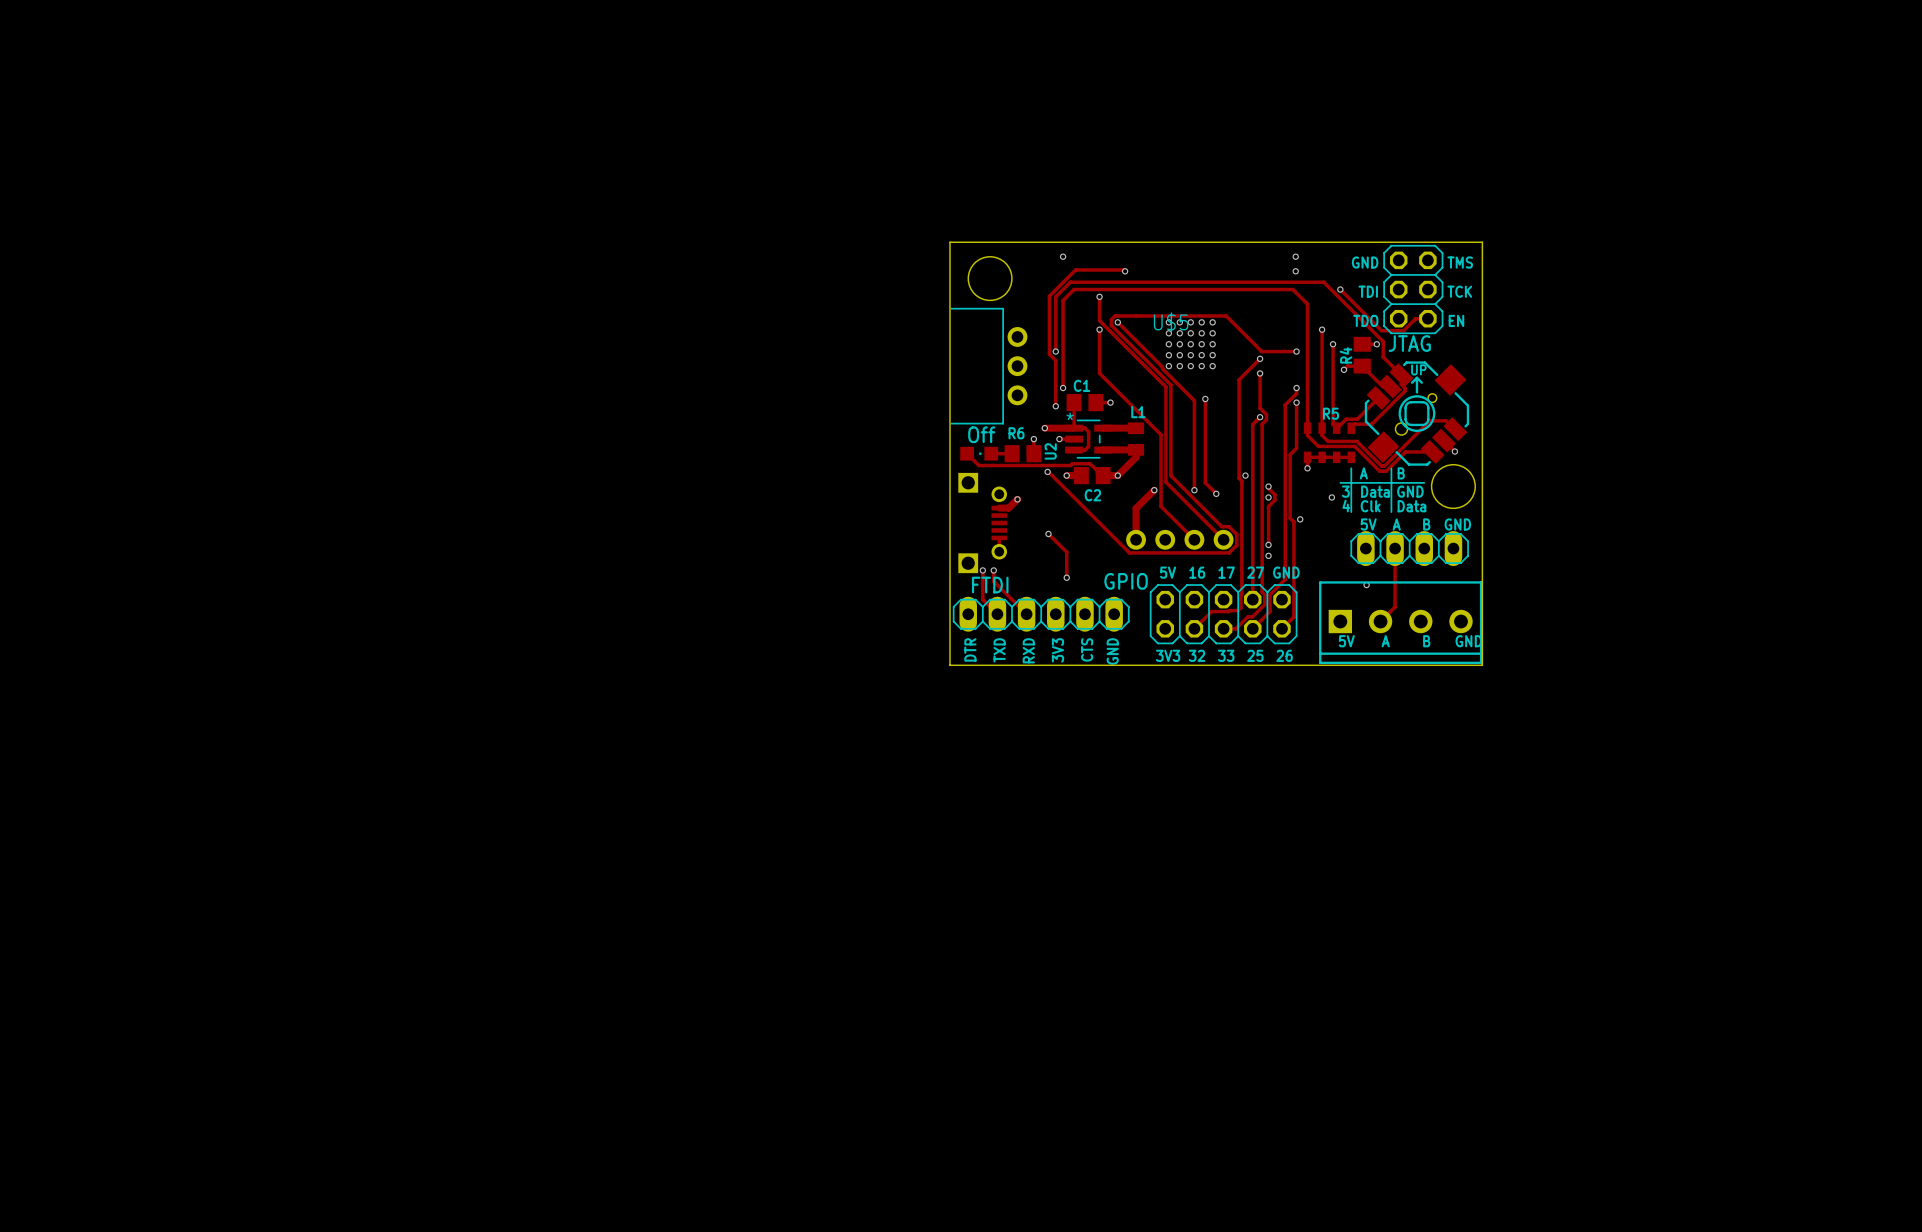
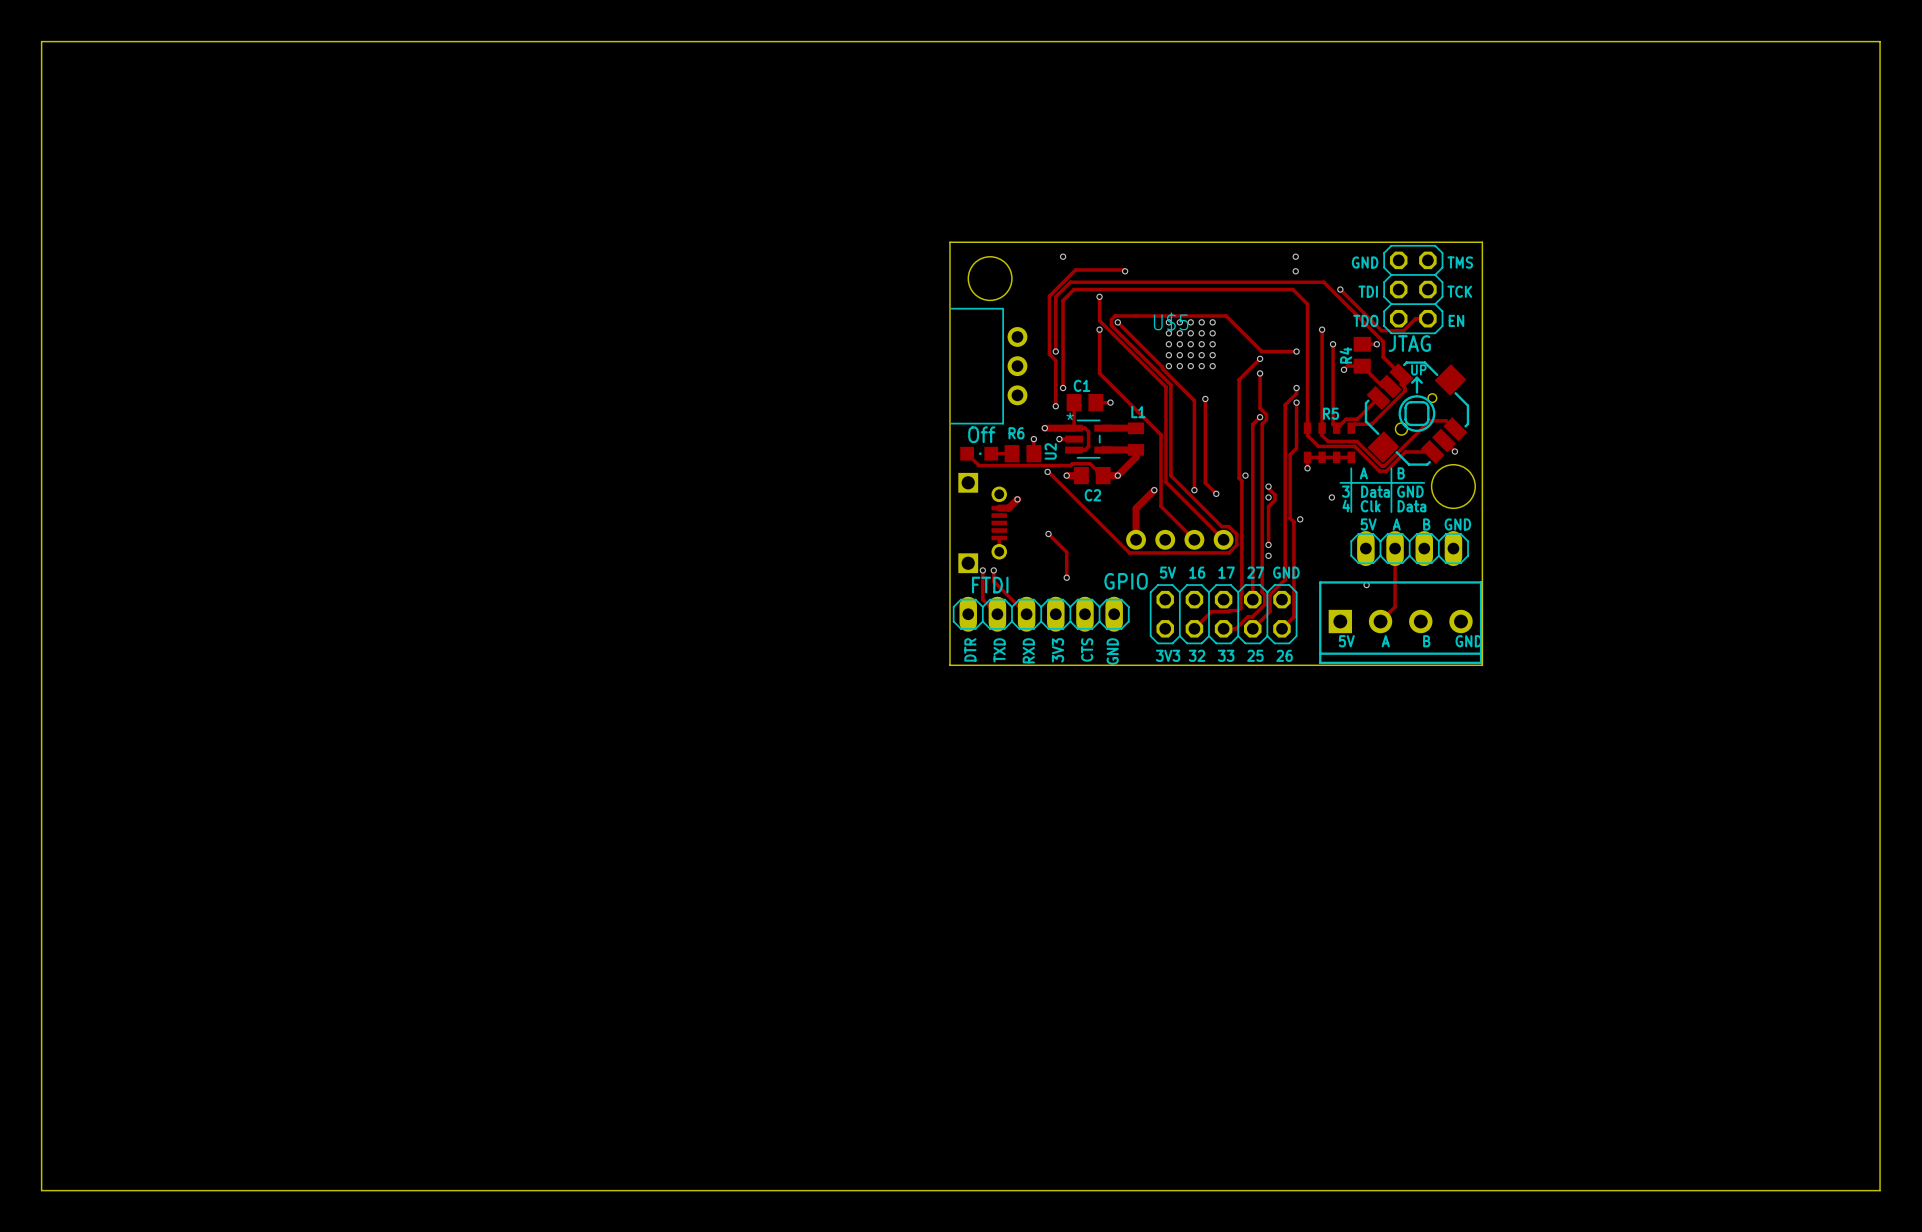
board edge: none -> (41, 41) (1880, 41) (1880, 1190) (41, 1190) (41, 41)

